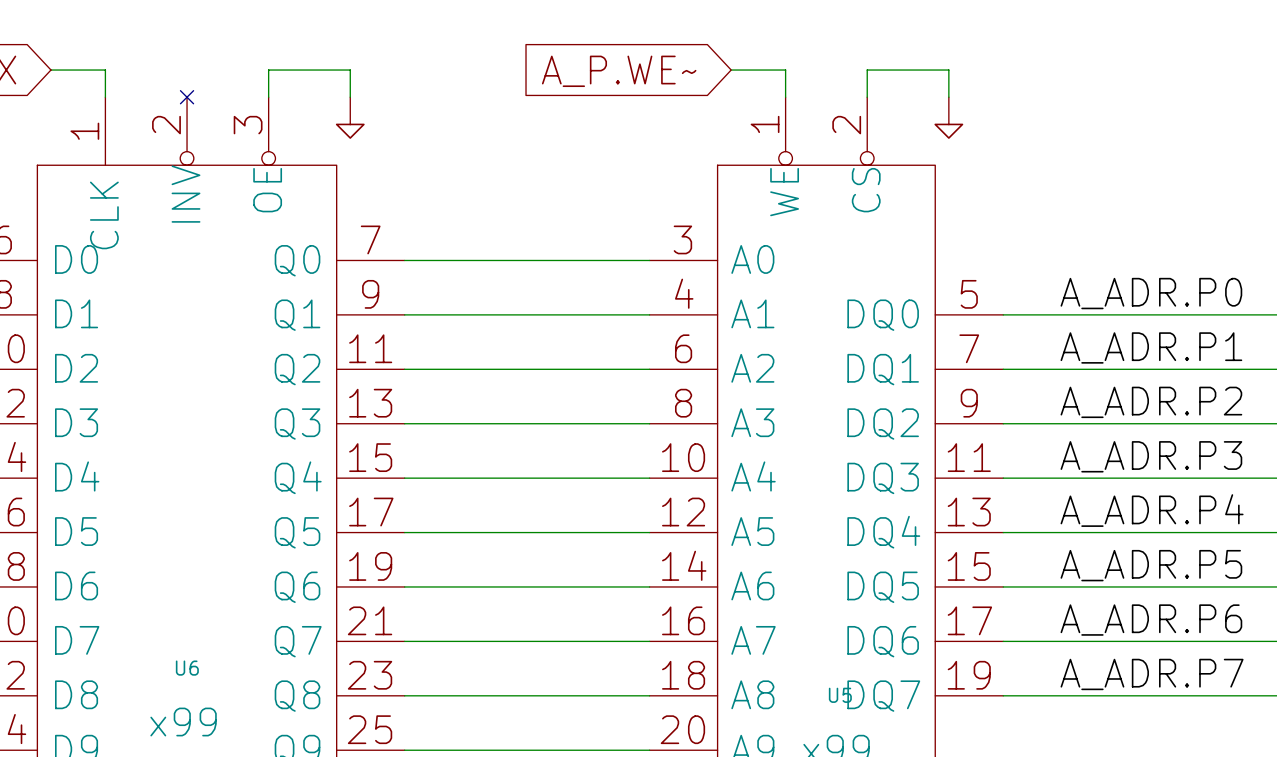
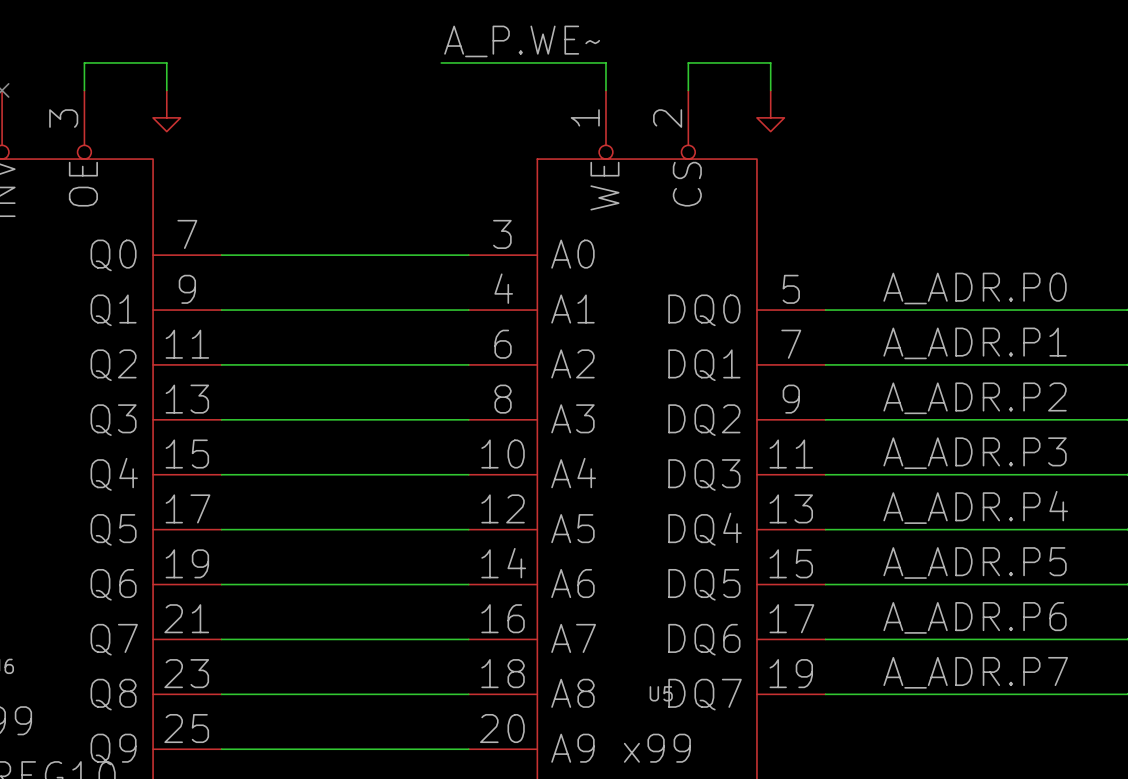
label: none -> A_P.WE~ (522, 41)
wire: none -> (441, 62) (551, 62)
global label: A_P.WE~ (619, 71) -> none

